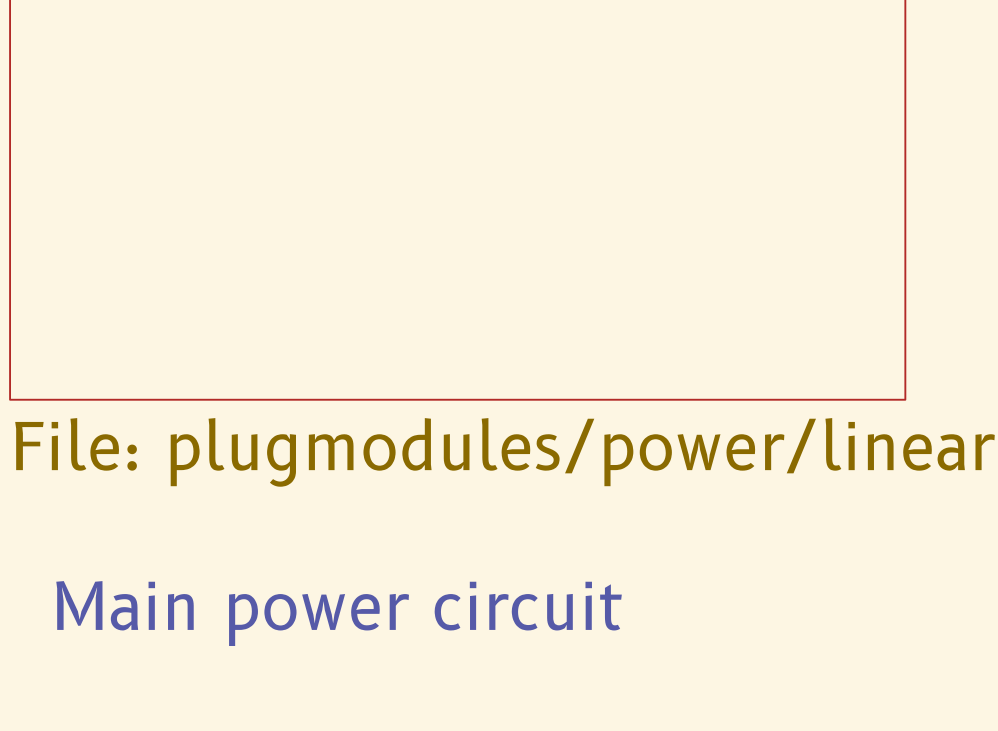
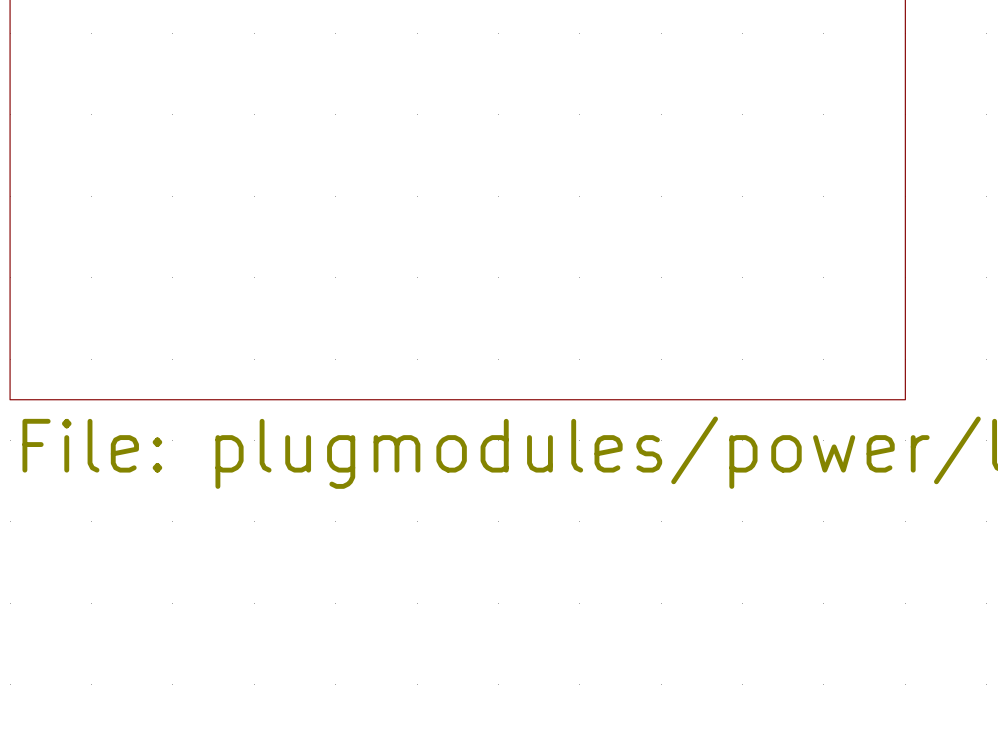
text: Main power circuit (339, 613) -> none

